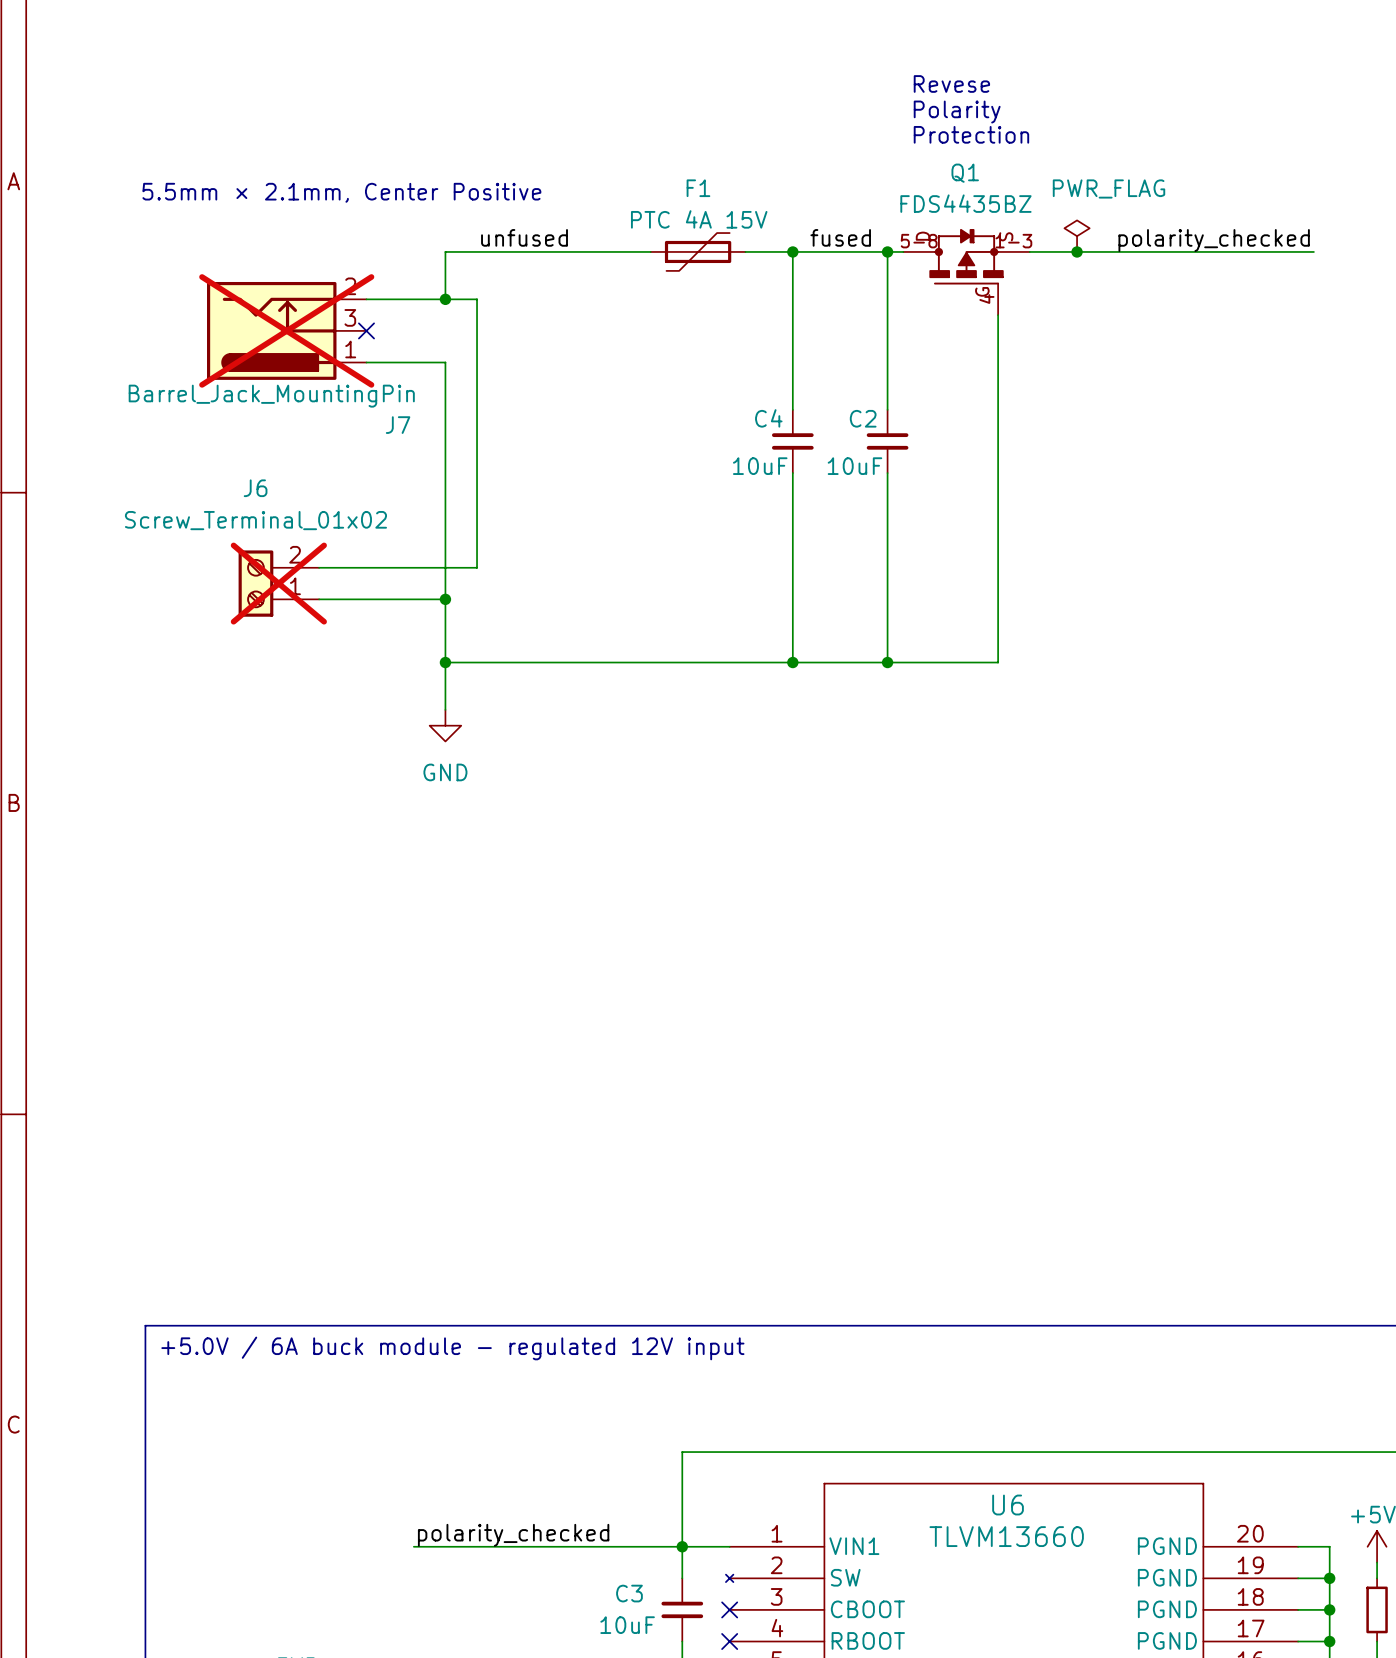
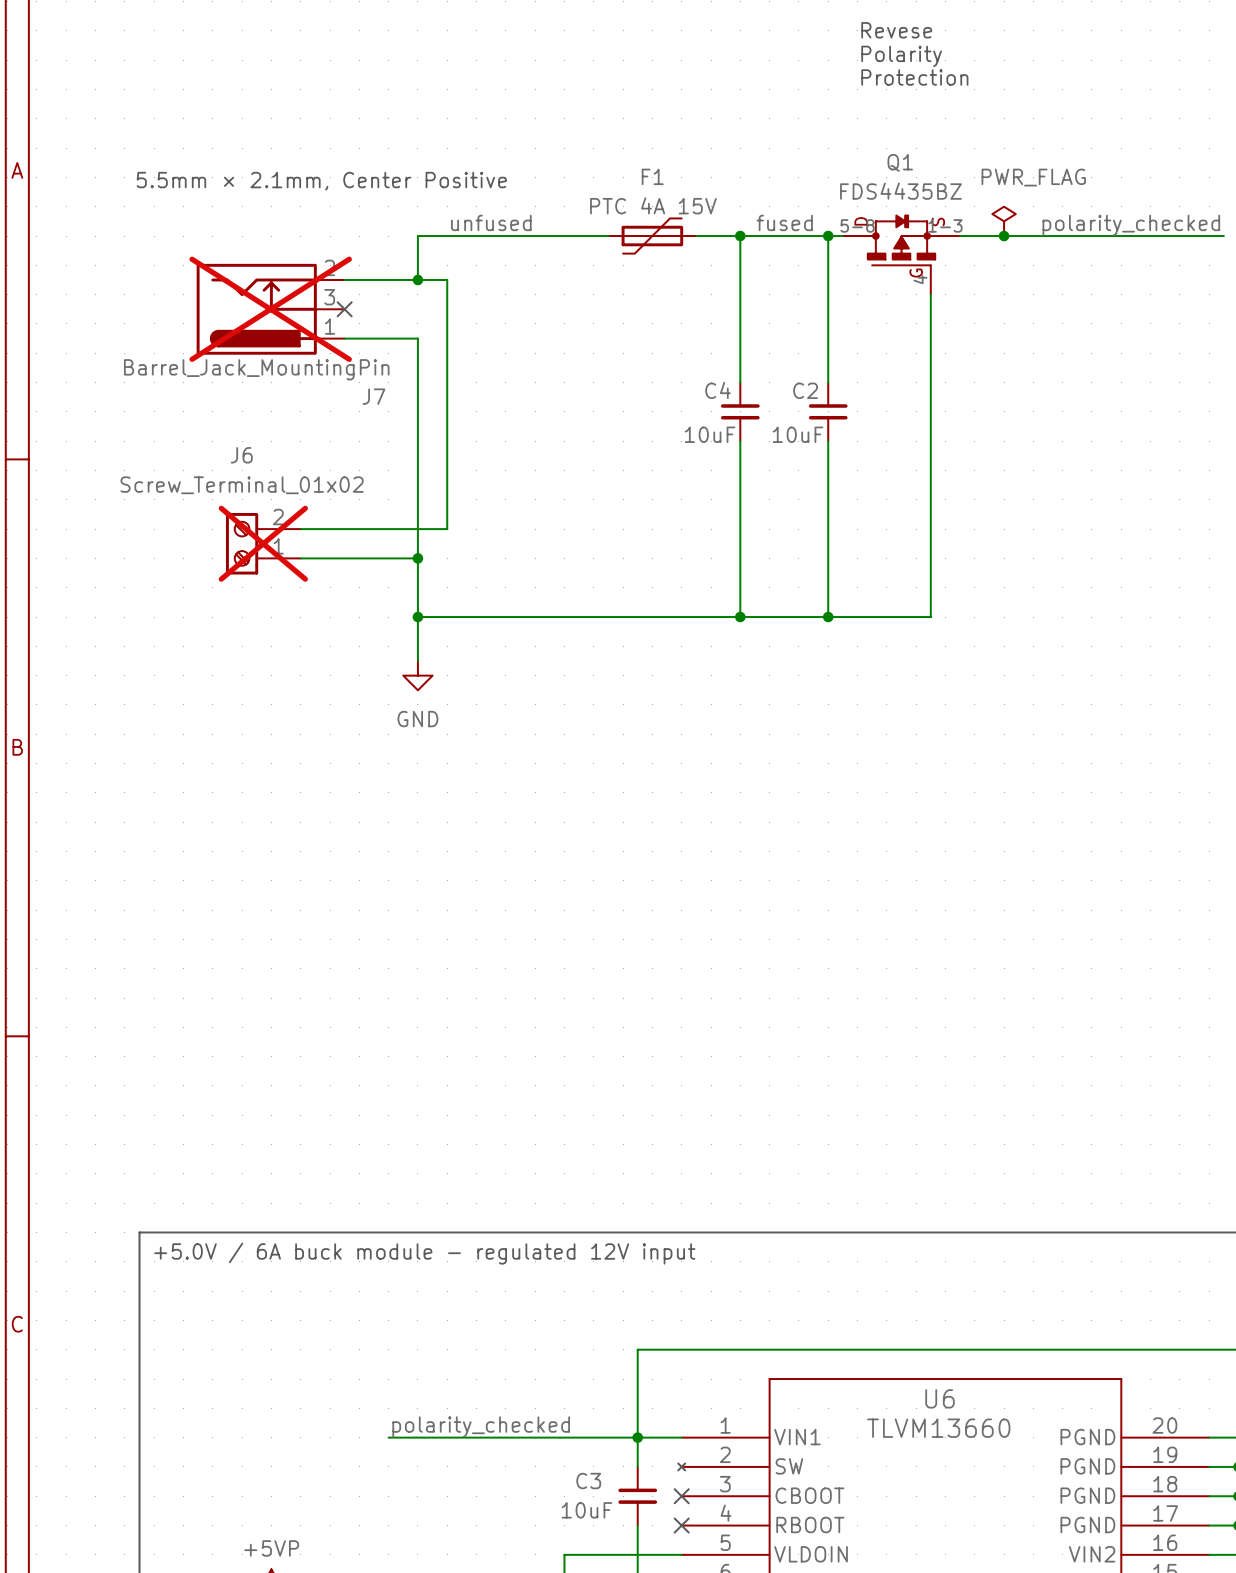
text: none -> Revese (896, 30)
text: Revese (951, 83) -> Protection (914, 77)
text position: Polarity (957, 112) -> Polarity (901, 56)
text: Protection (971, 134) -> none

